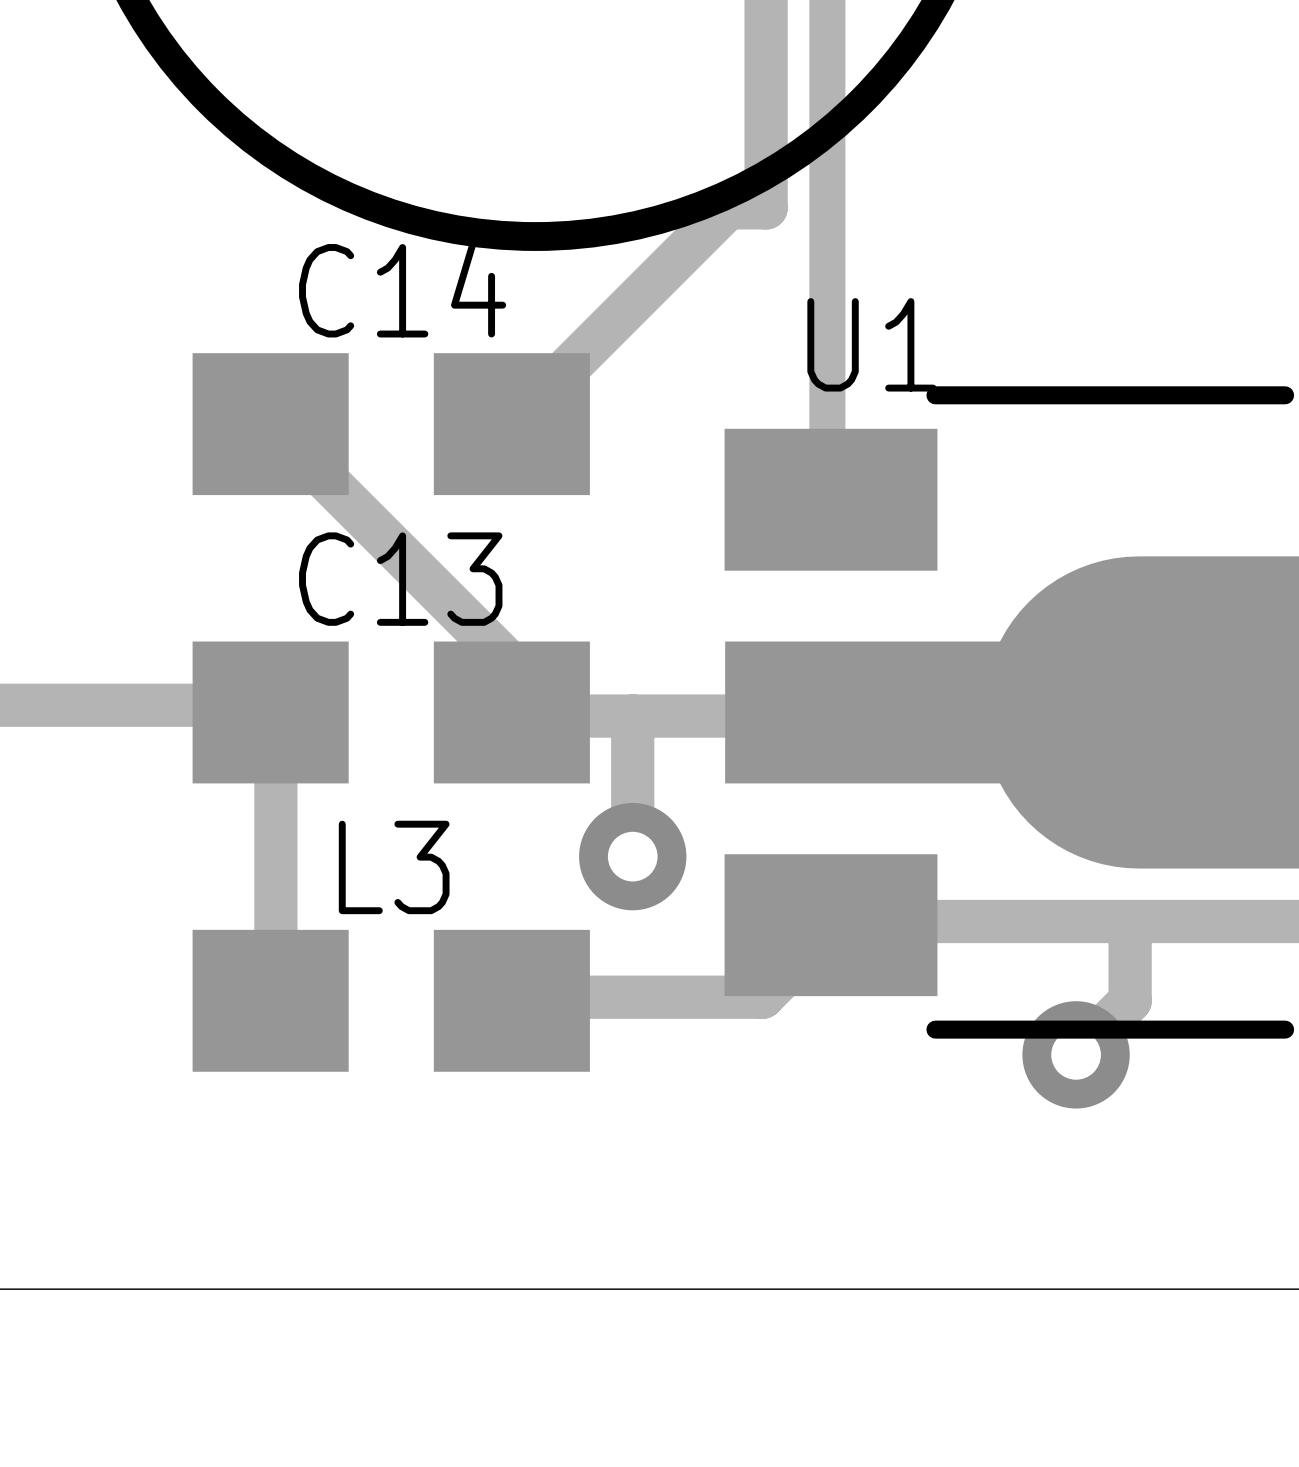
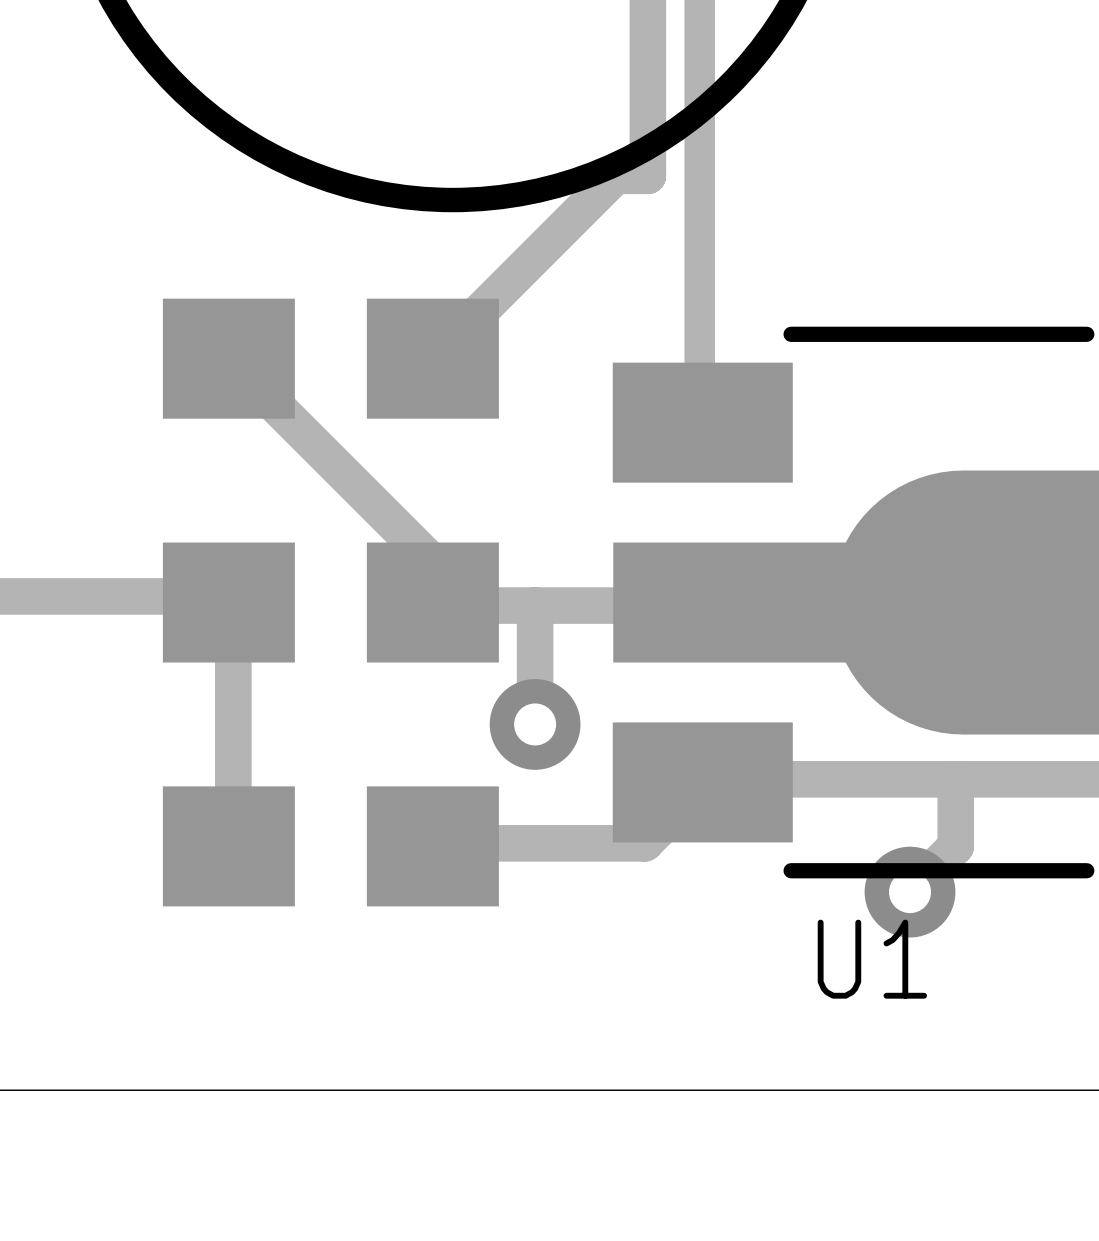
C14 name: C14 (402, 288) -> none
U1 name position: U1 (871, 344) -> U1 (872, 959)
C13 name: C13 (400, 579) -> none
L3 name: L3 (394, 867) -> none

